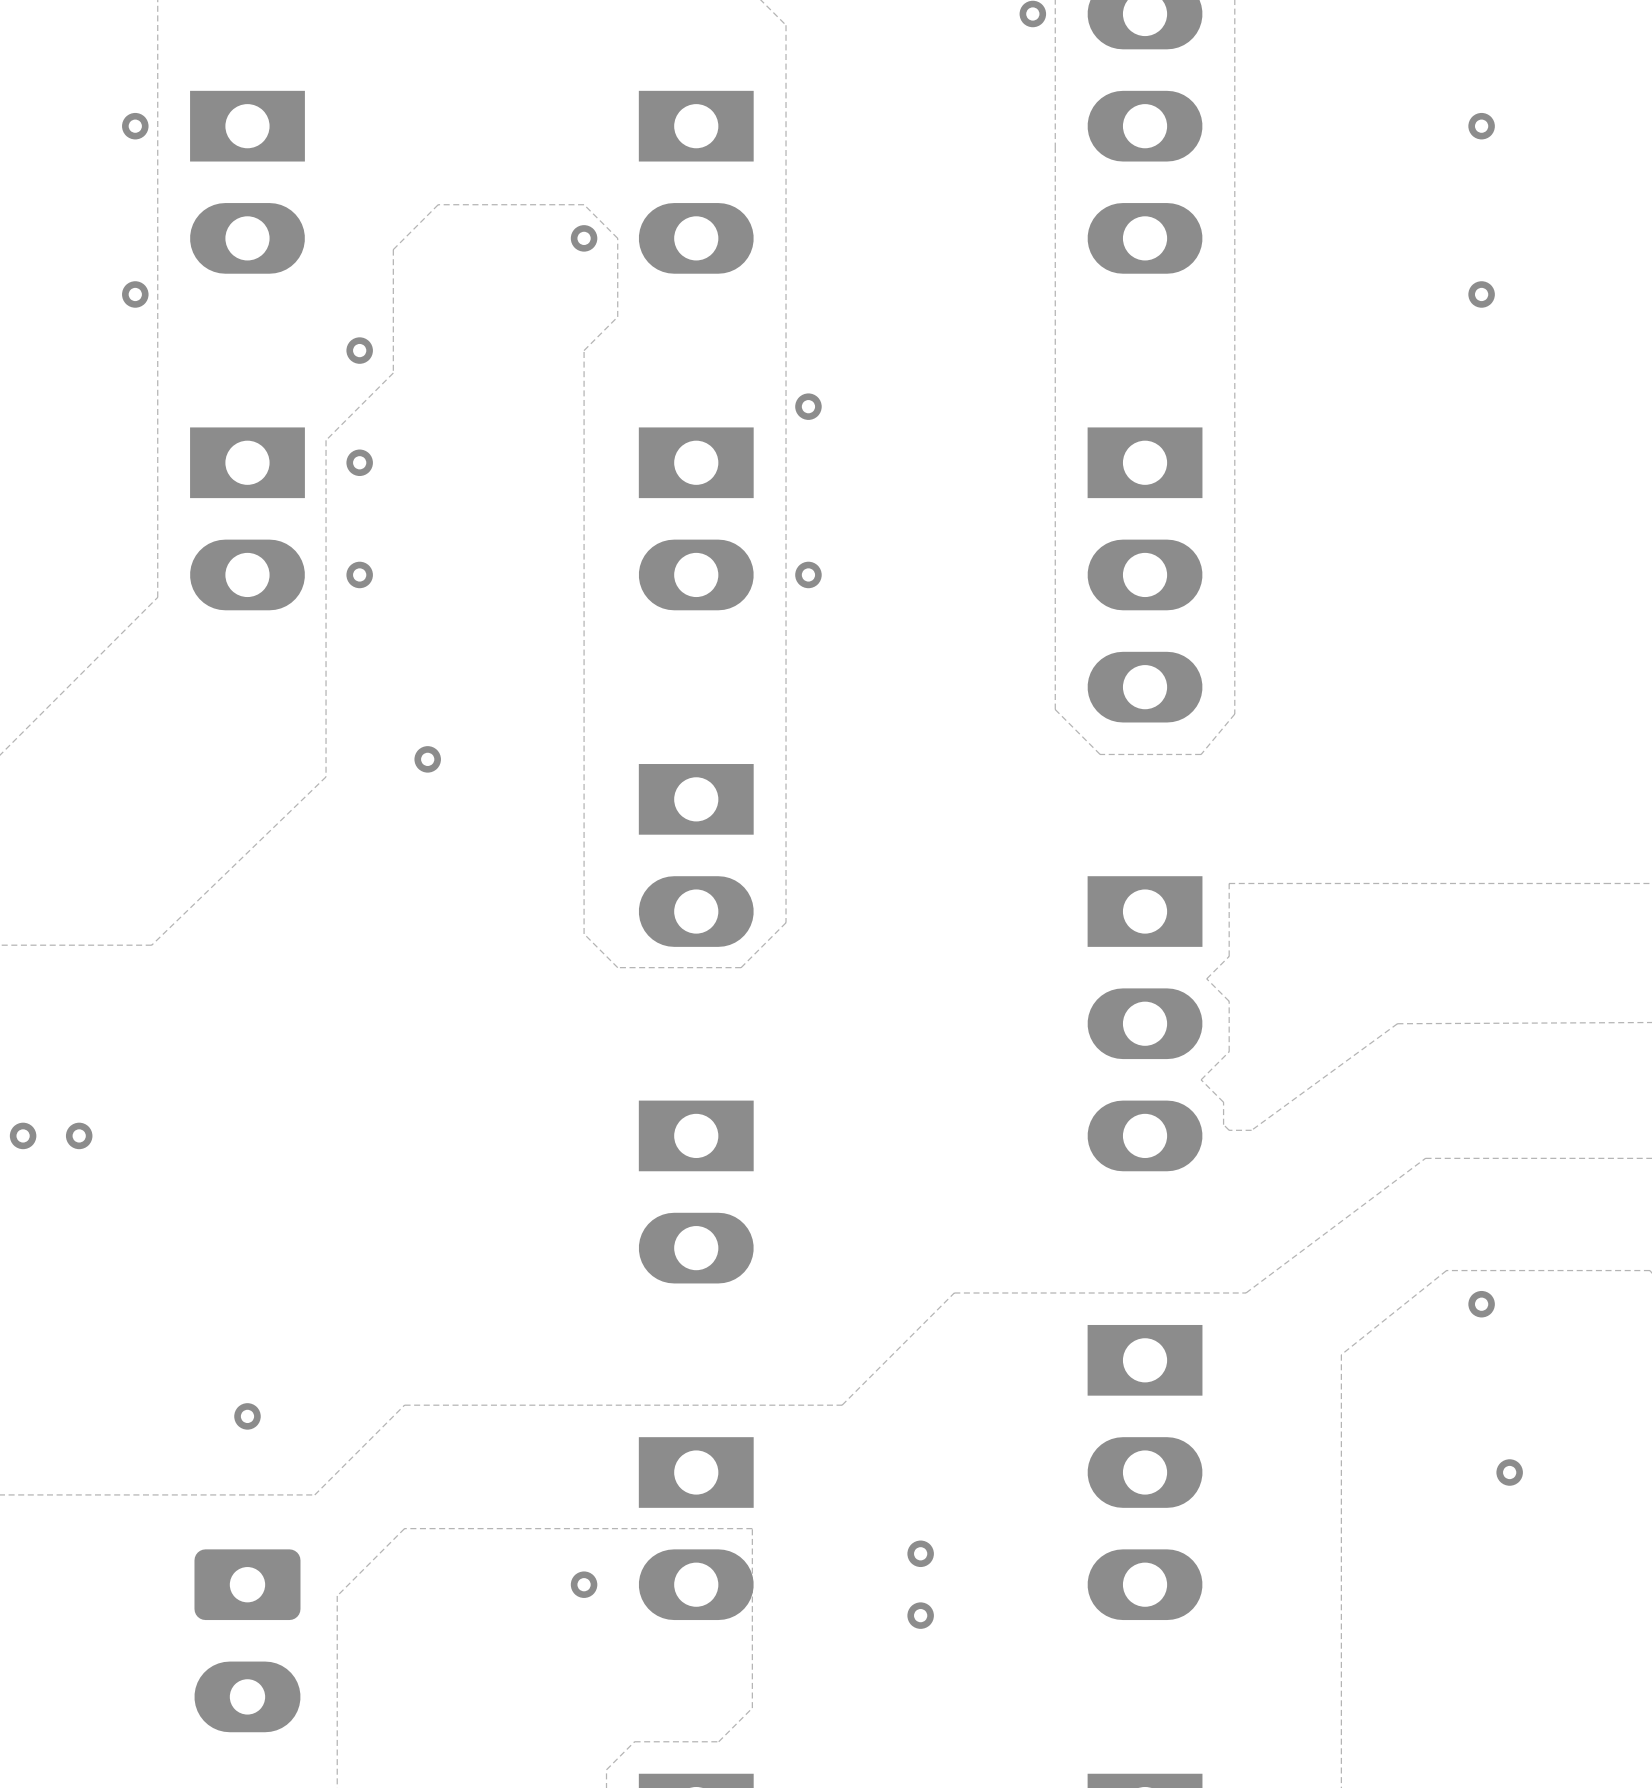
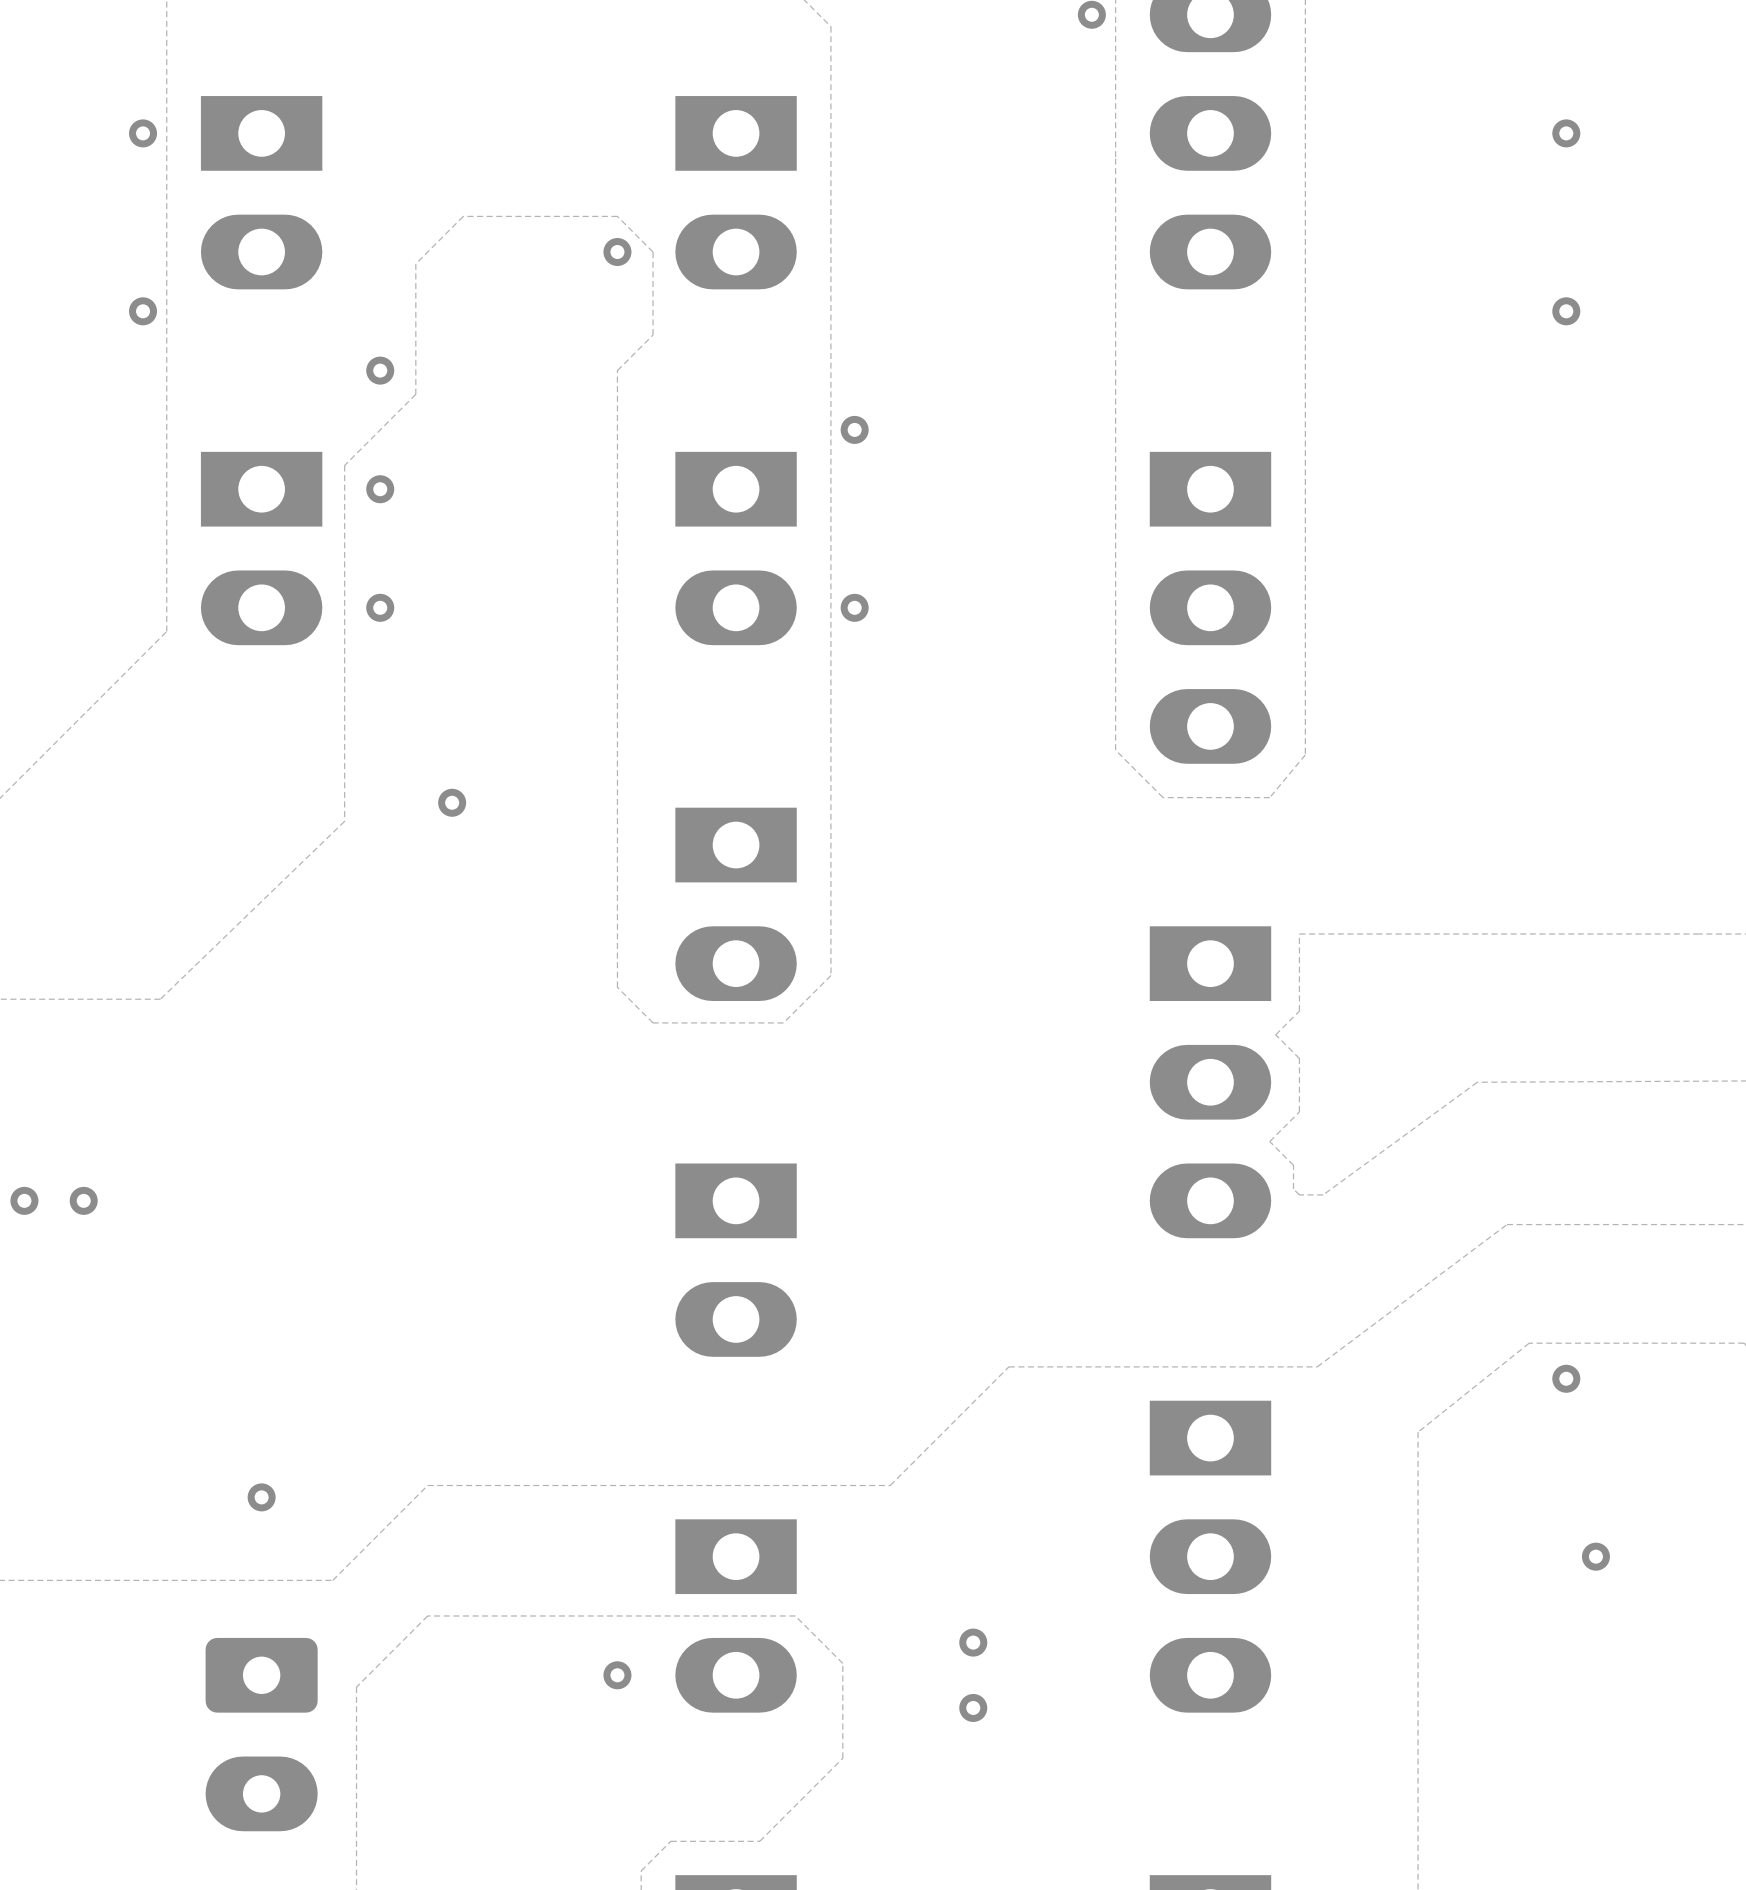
zone outline: (752, 1528) (752, 1708) -> (795, 1615) (842, 1663) (842, 1758) (795, 1805)

